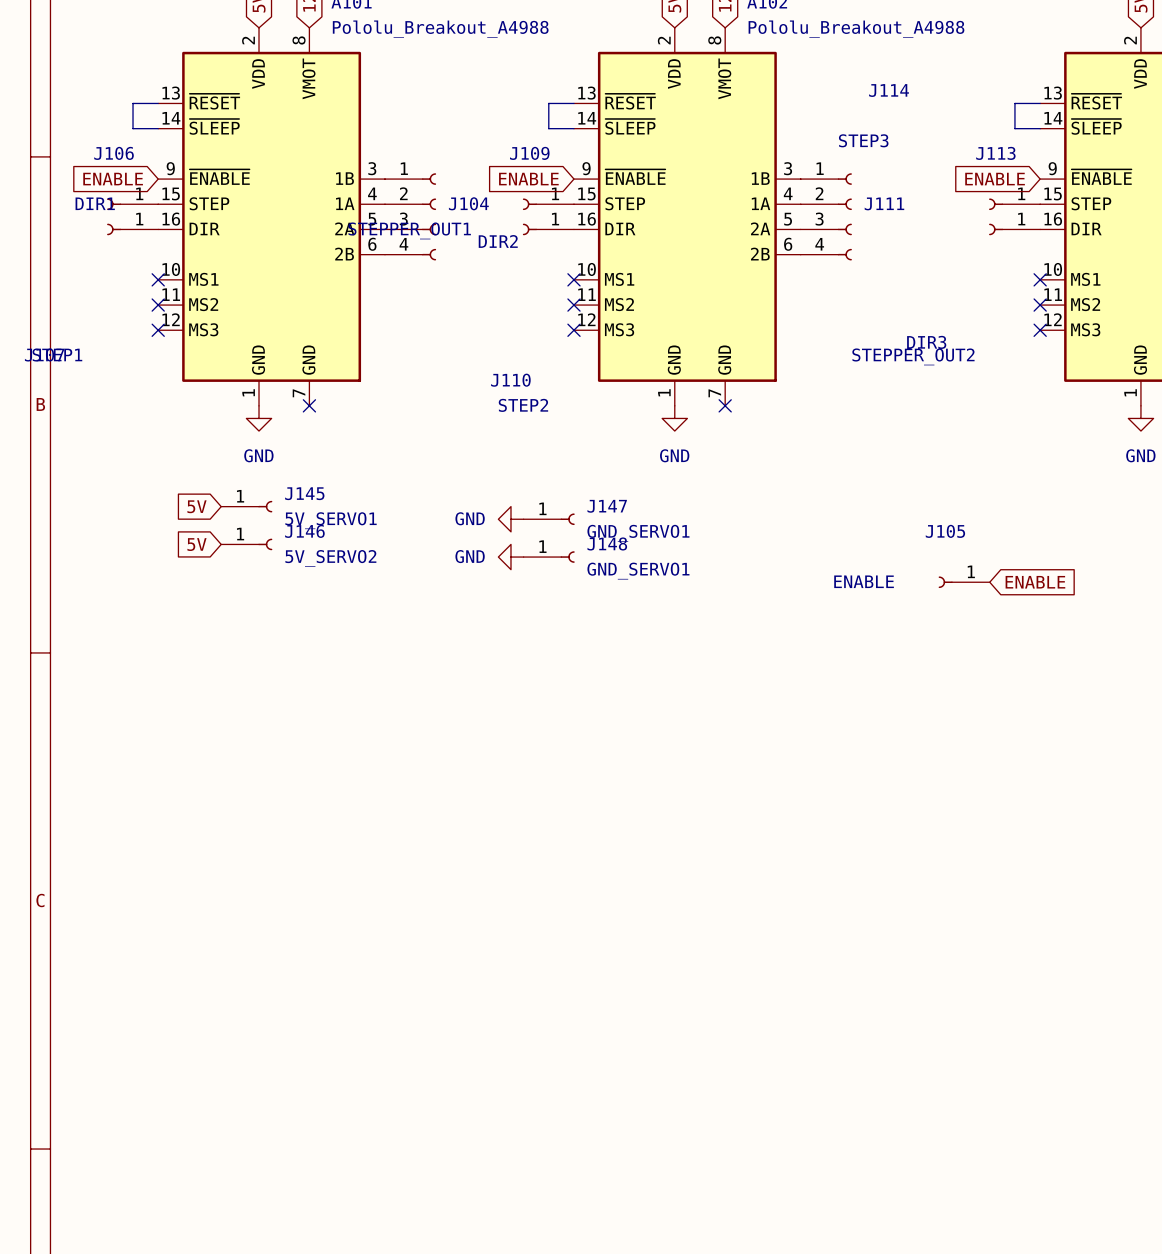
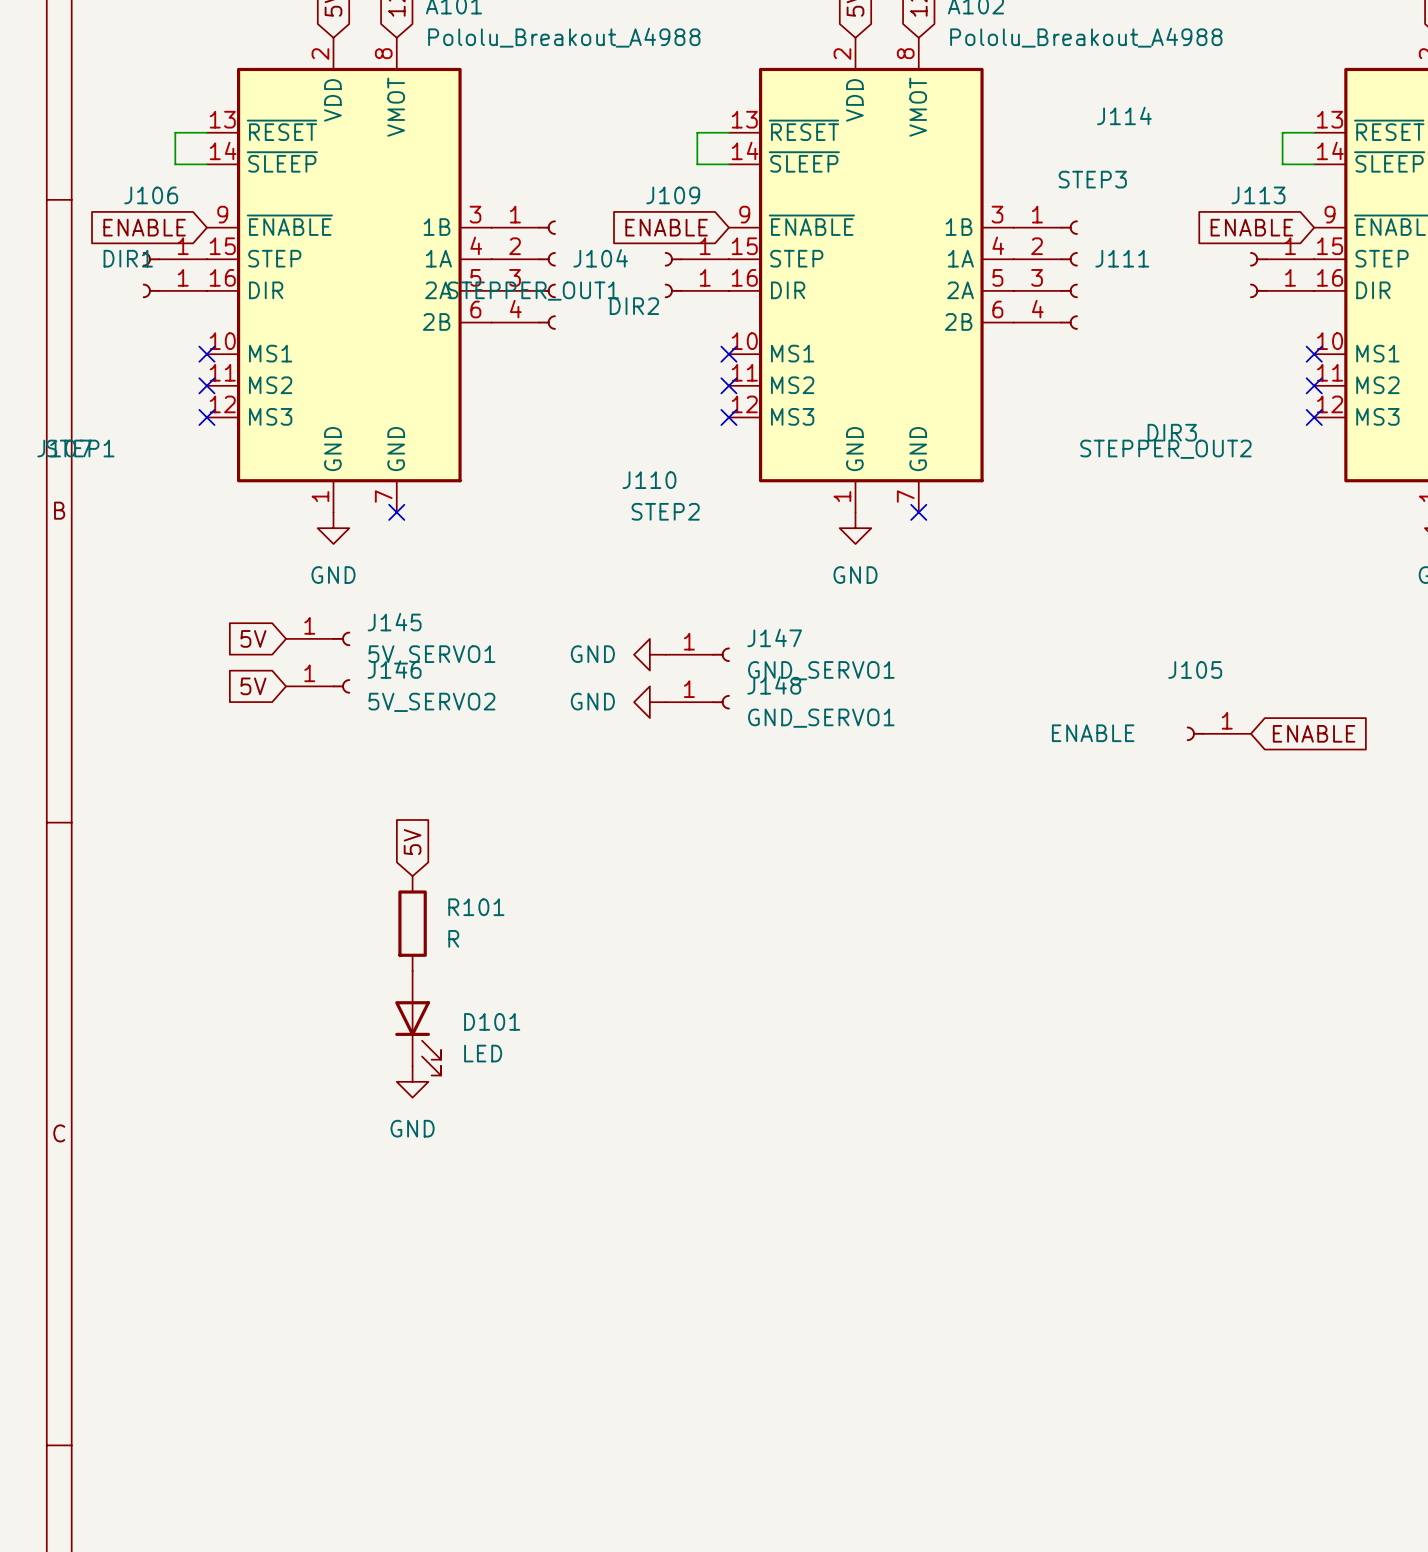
global label: none -> 5V (412, 842)
R101: none -> R (412, 923)
D101: none -> LED (418, 1023)
power symbol: none -> GND (412, 1081)

